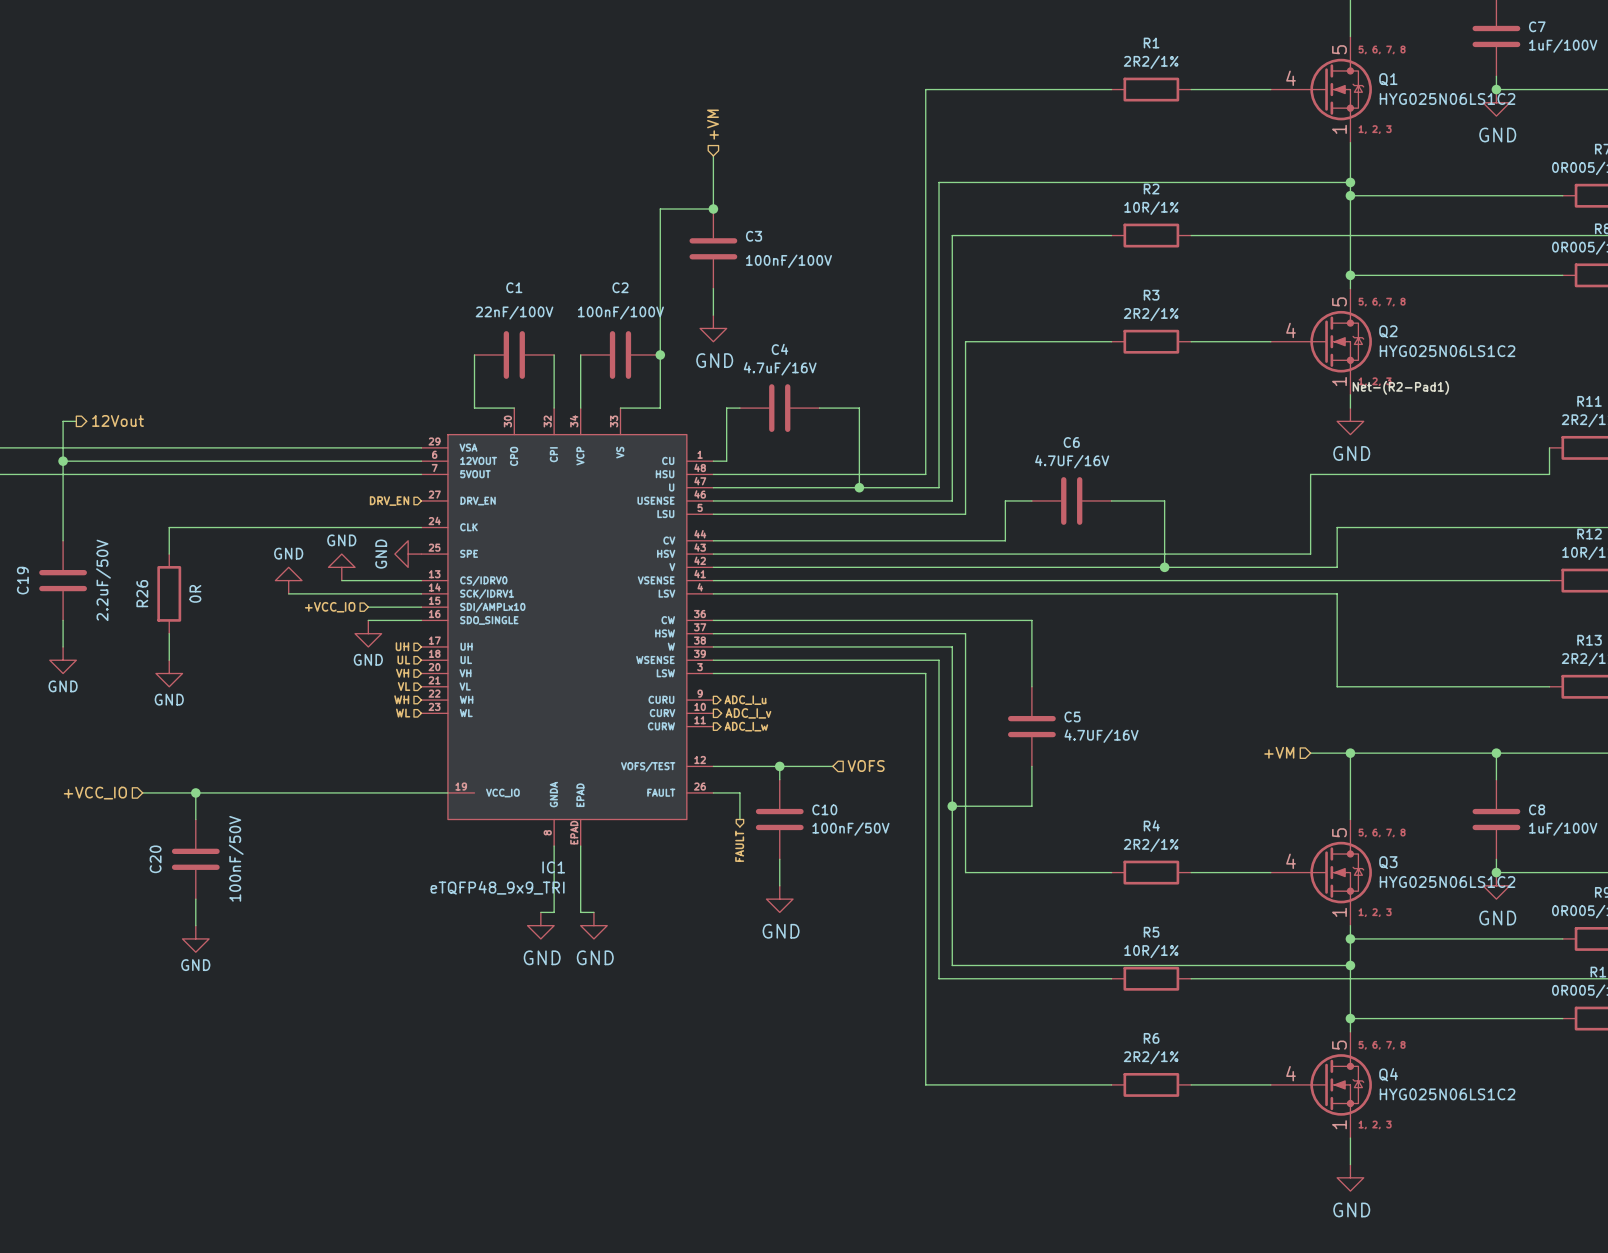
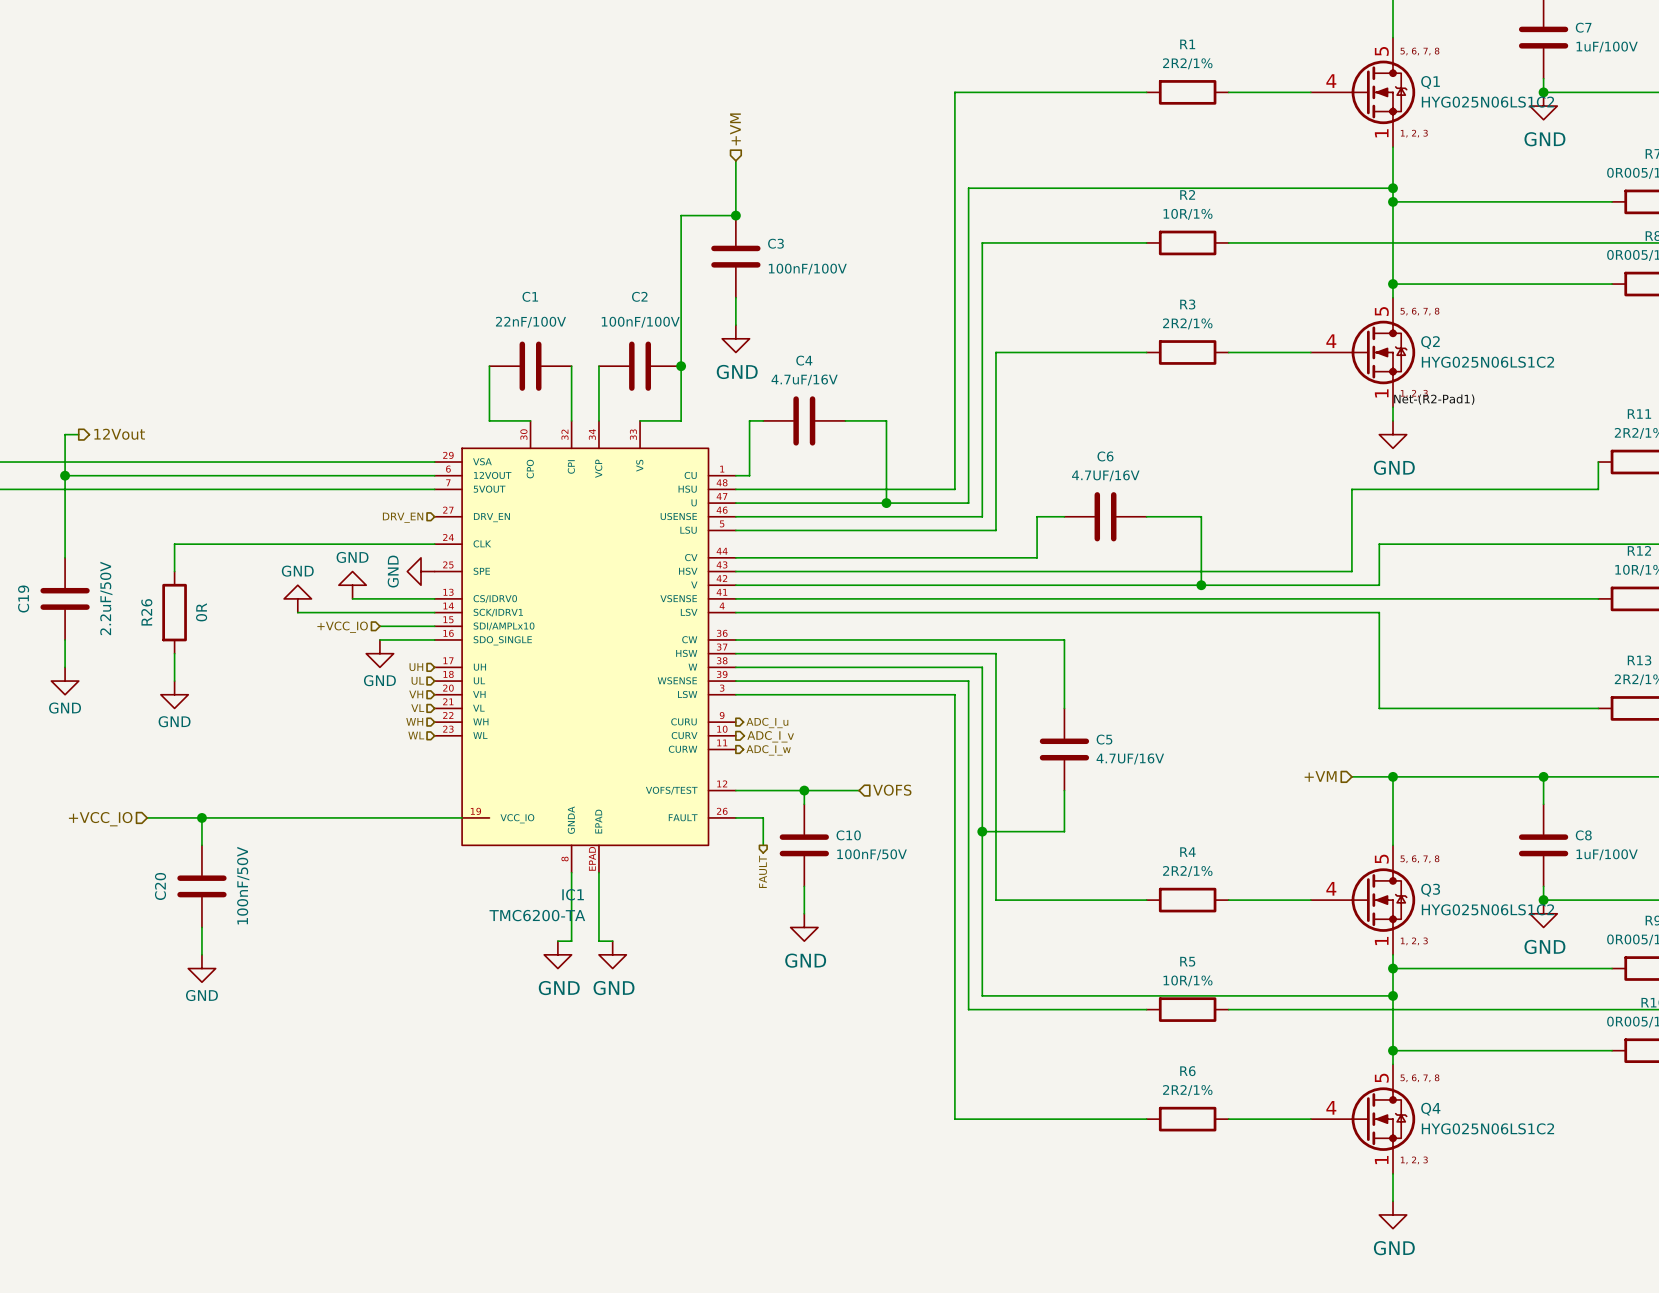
IC1 value: eTQFP48_9x9_TRI (497, 887) -> TMC6200-TA (537, 915)

